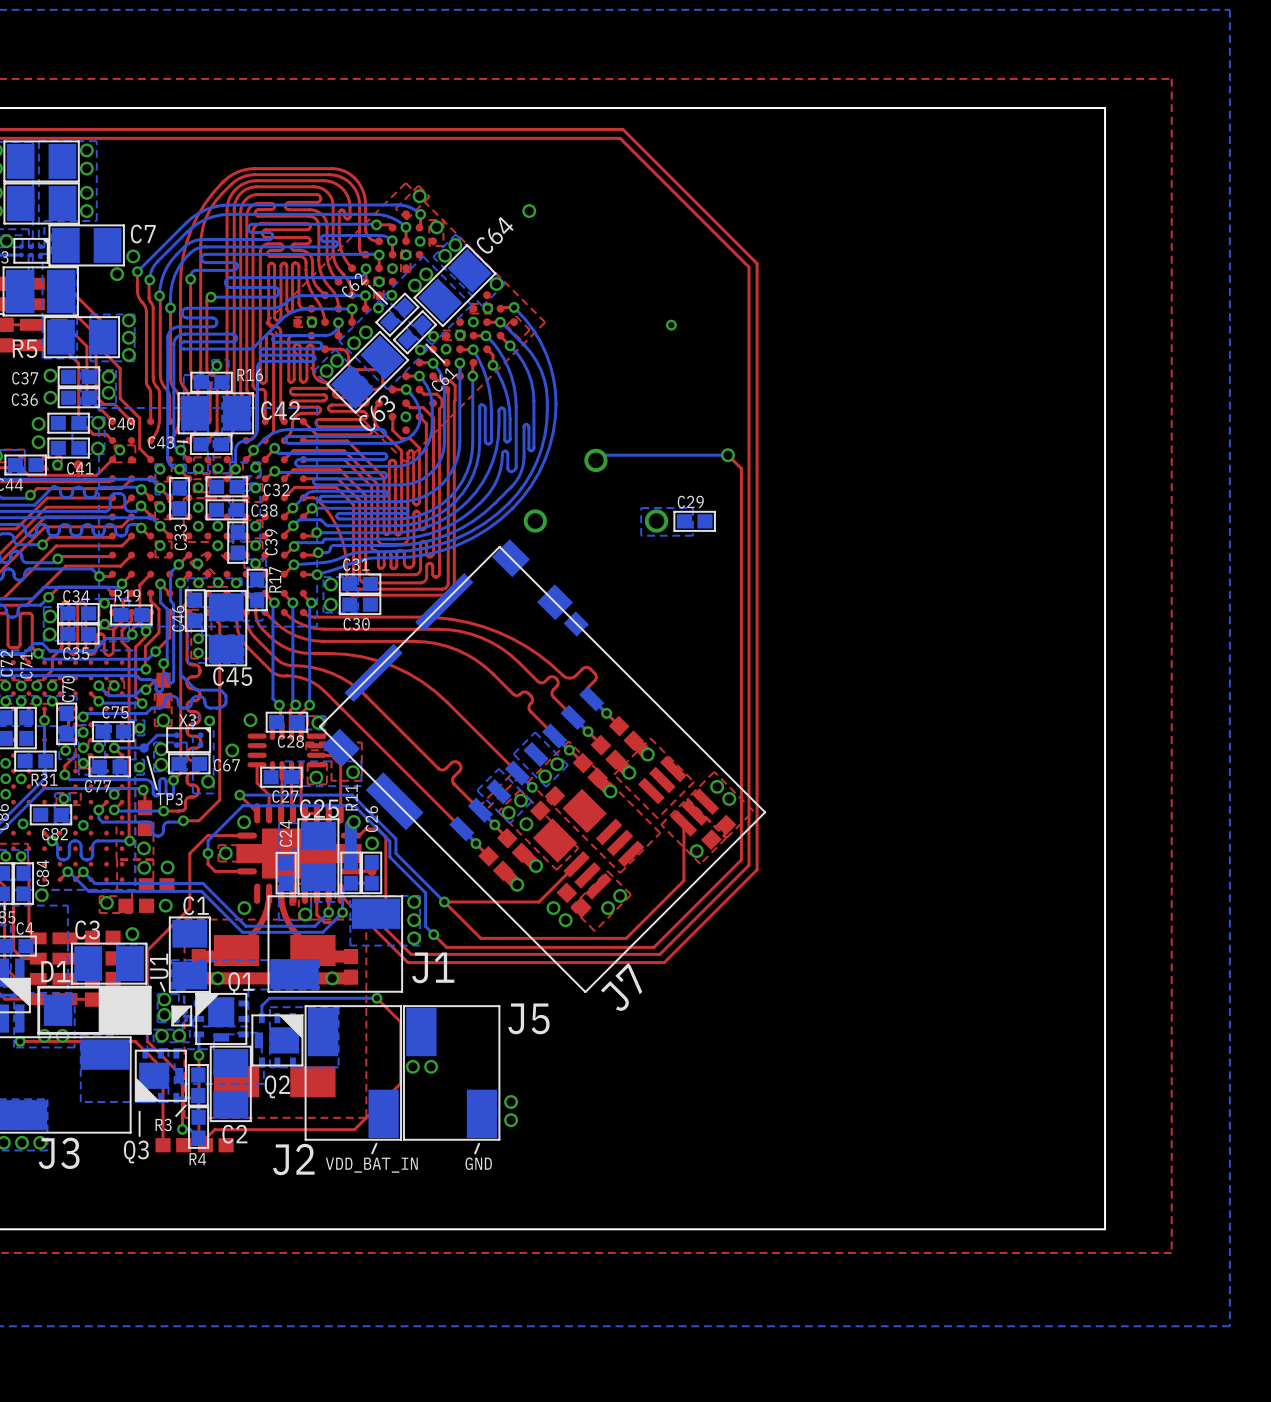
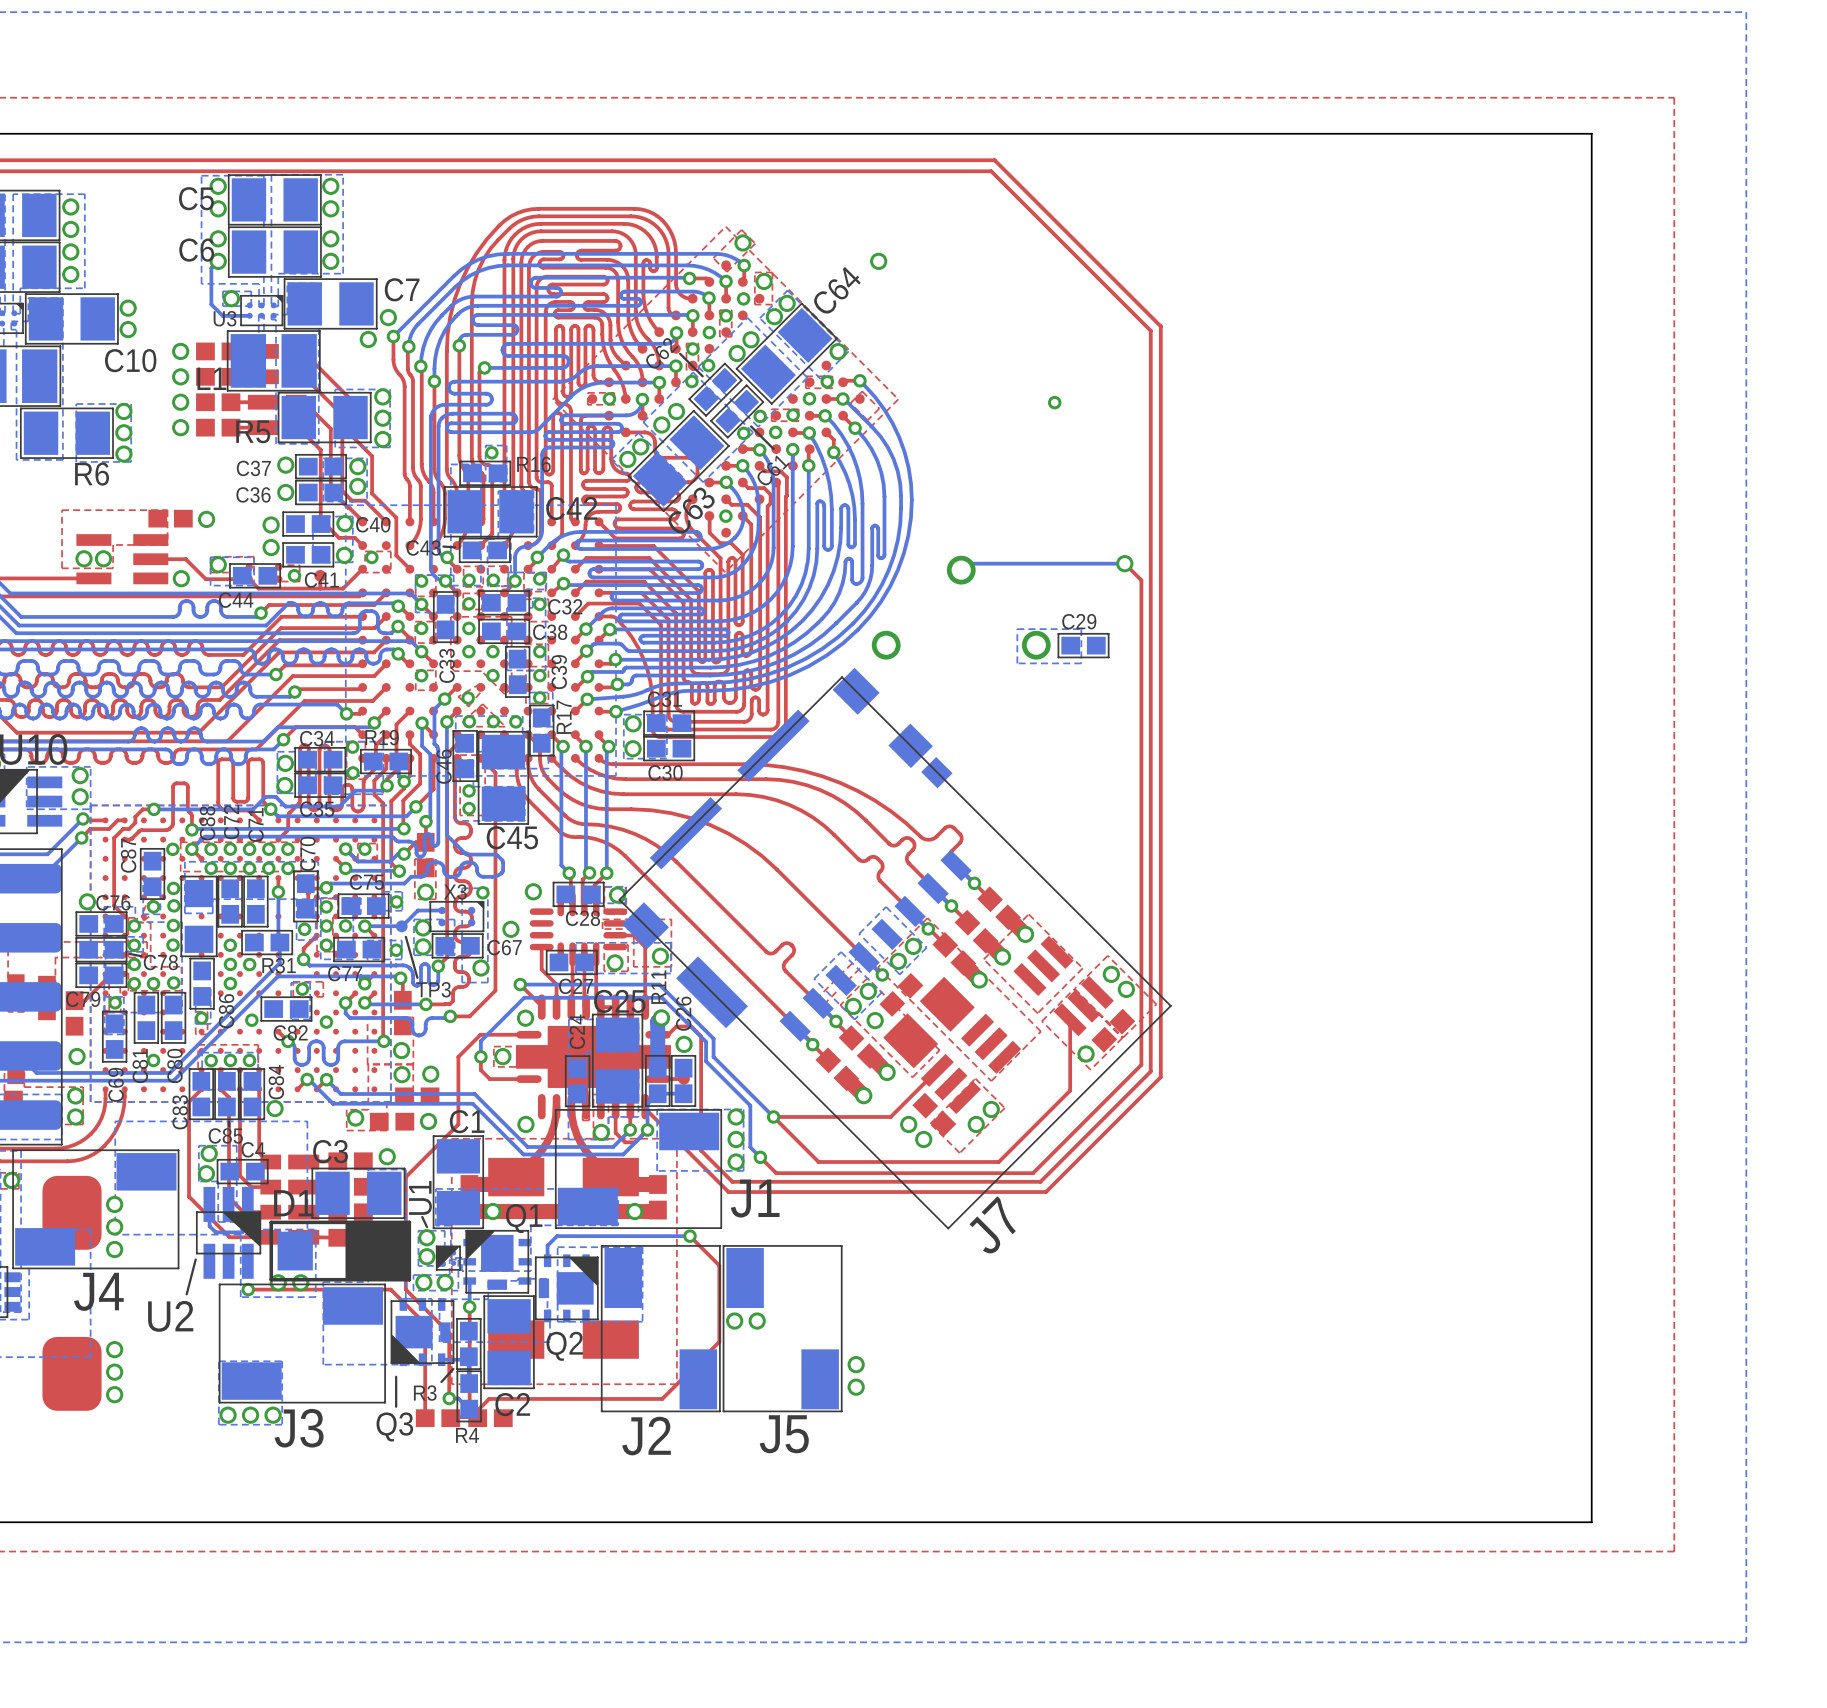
J5 name position: J5 (528, 1018) -> J5 (784, 1434)
line: (376, 1143) (372, 1153) -> none
line: (479, 1143) (475, 1153) -> none
J2 name position: J2 (293, 1159) -> J2 (646, 1436)
text: GND (478, 1163) -> none
text: VDD_BAT_IN (371, 1165) -> none

